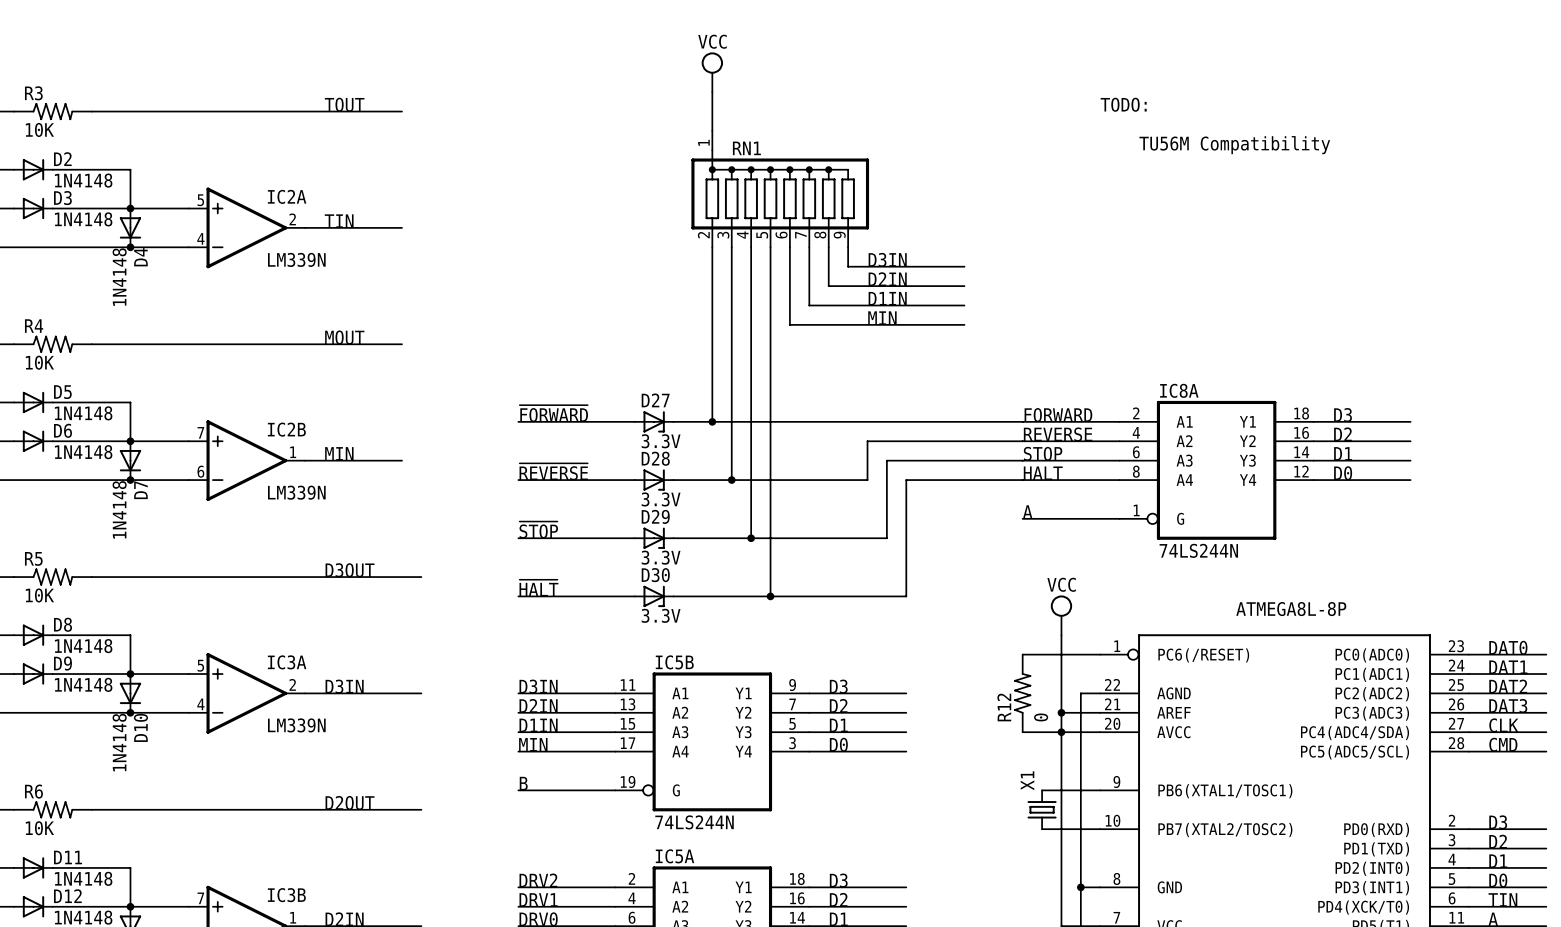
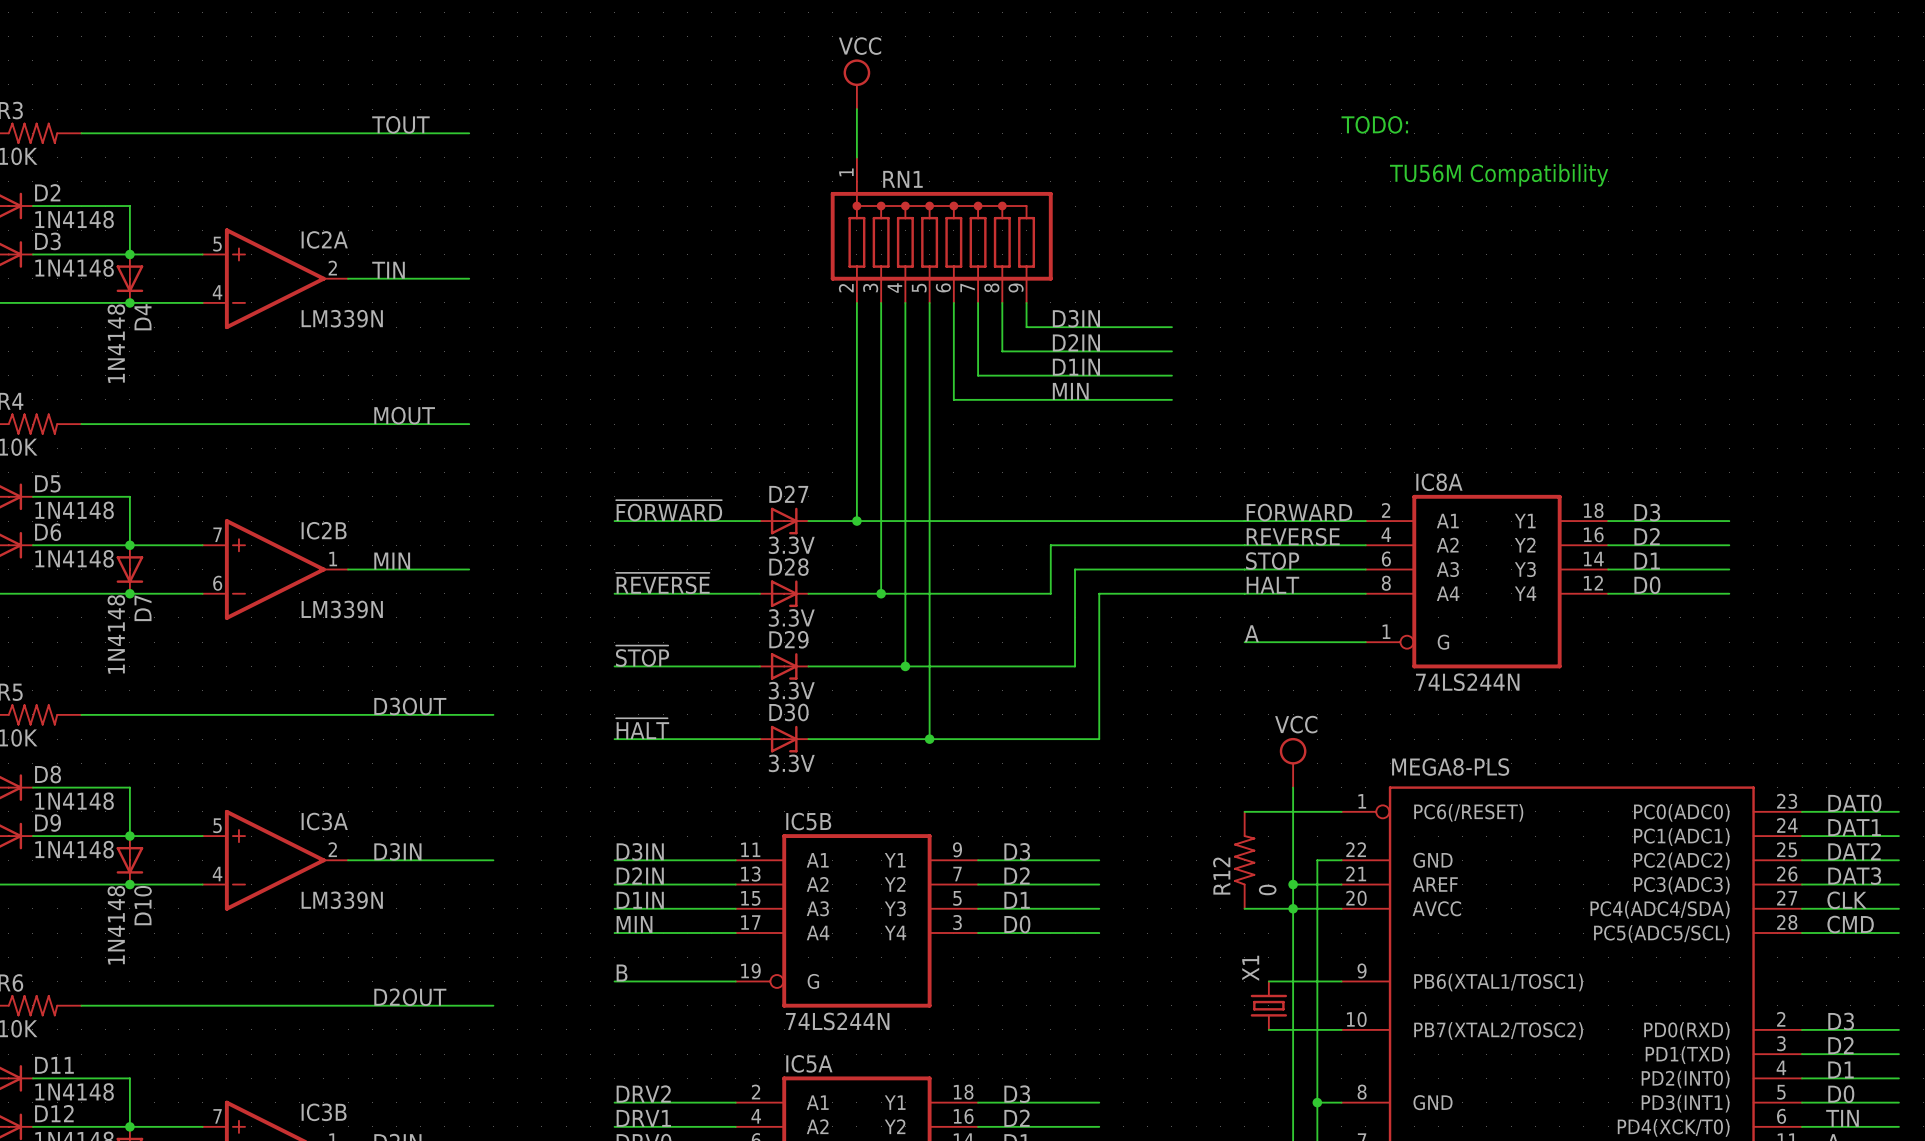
part value: ATMEGA8L-8P (1291, 609) -> MEGA8-PLS (1450, 767)
part pin name: AGND (1173, 693) -> GND (1433, 860)

